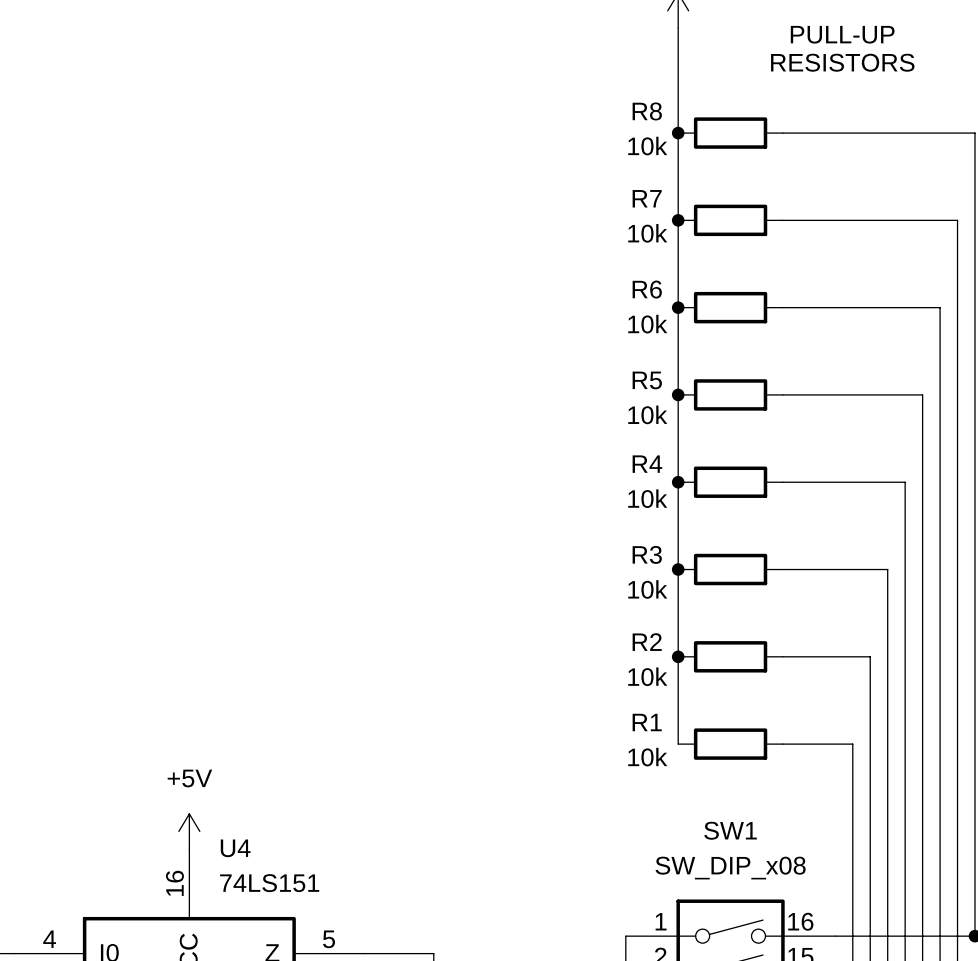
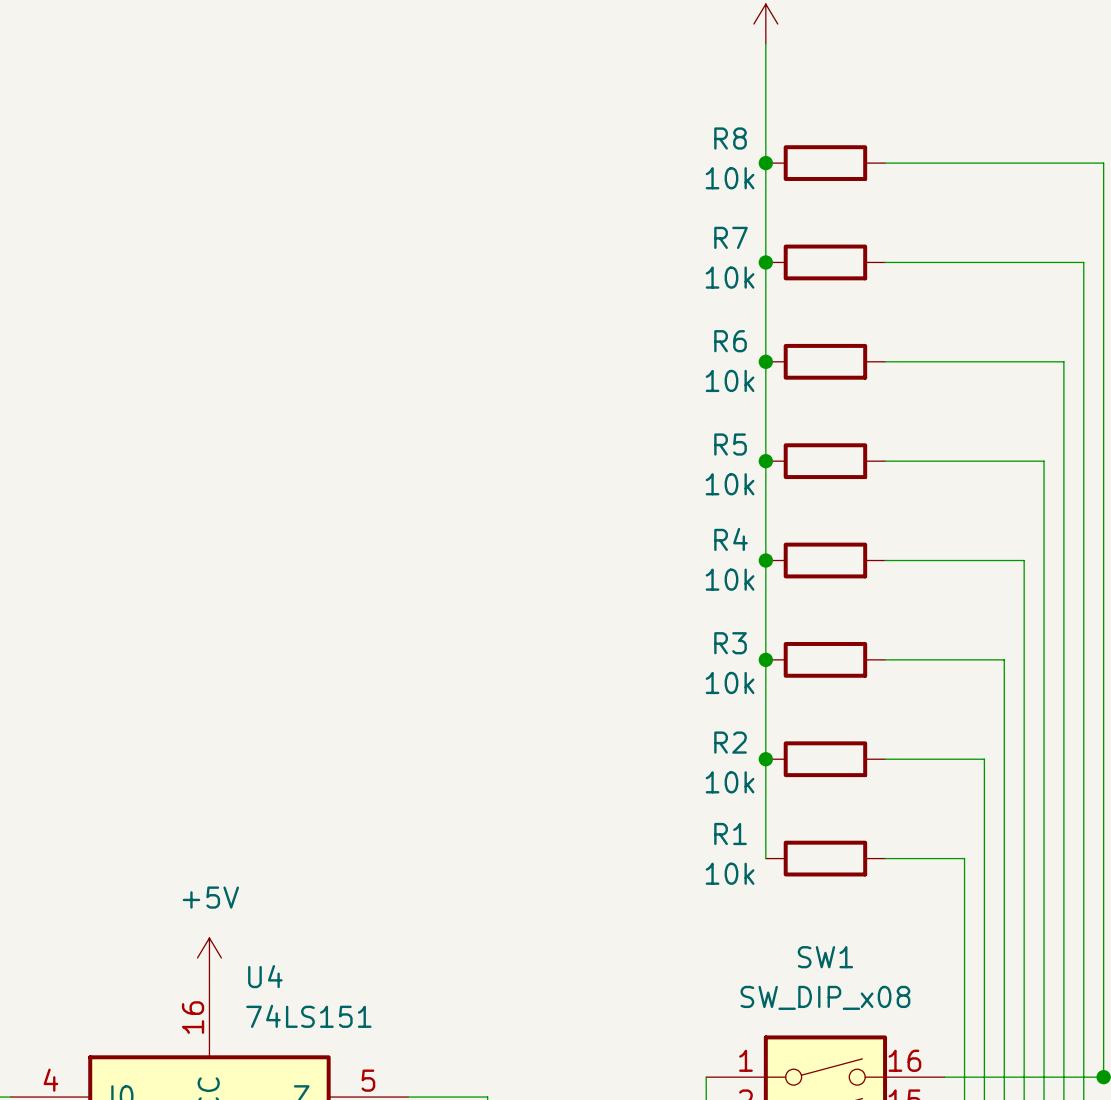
text: PULL-UP (842, 34) -> none
text: RESISTORS (842, 62) -> none

